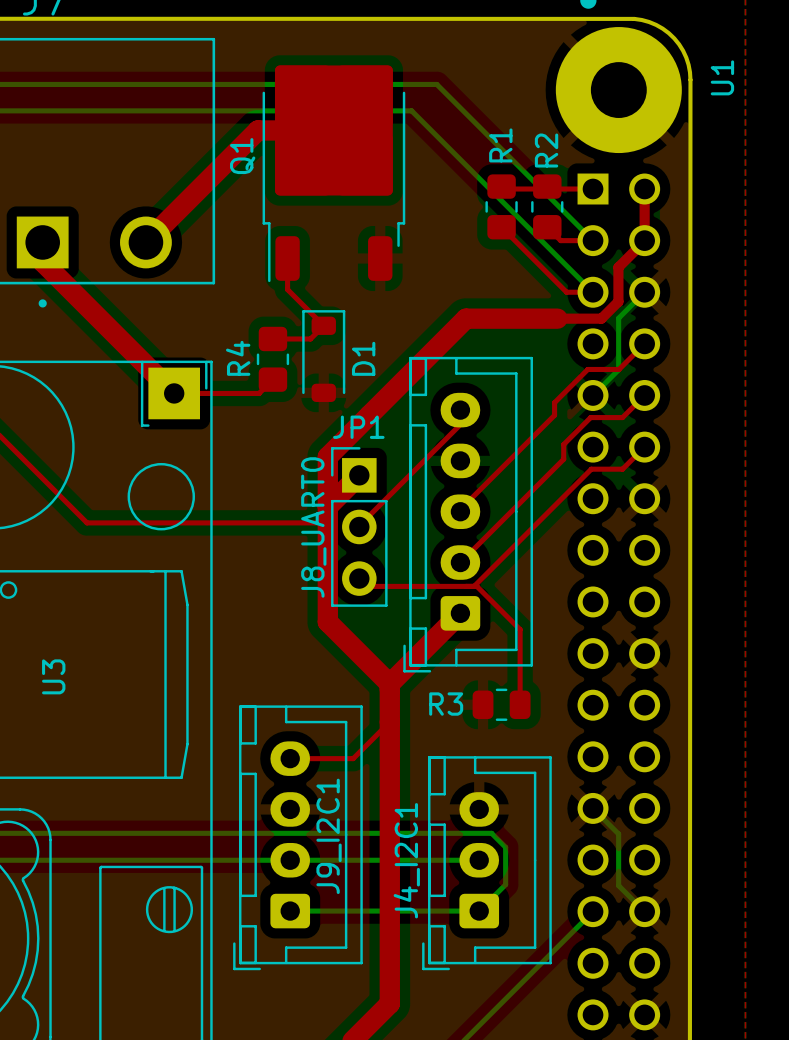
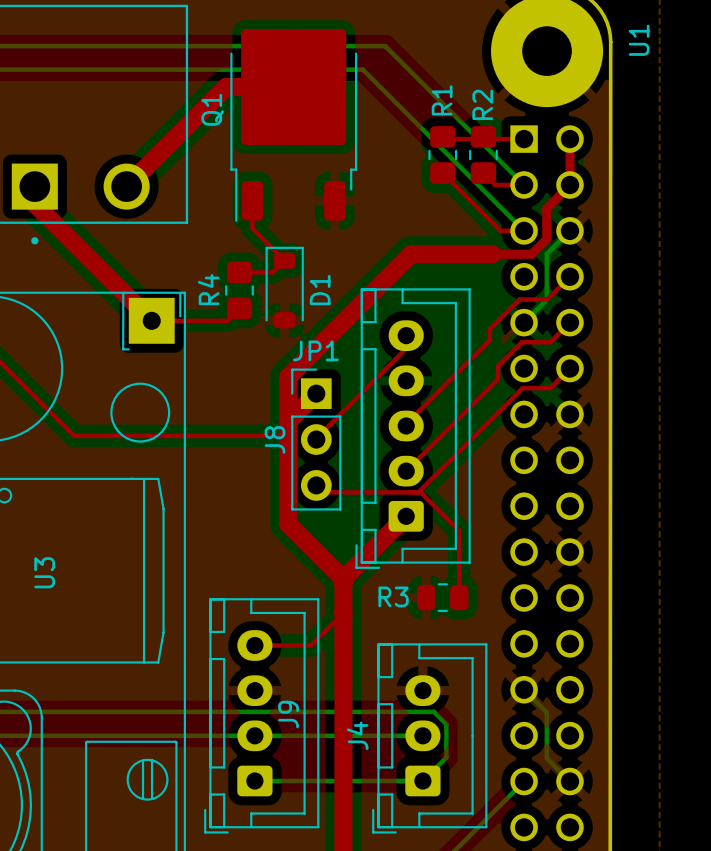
J8_UART0 name: J8_UART0 (313, 527) -> J8 (274, 439)
J9_I2C1 name: J9_I2C1 (329, 836) -> J9 (288, 714)
J4_I2C1 name: J4_I2C1 (406, 860) -> J4 (357, 735)

